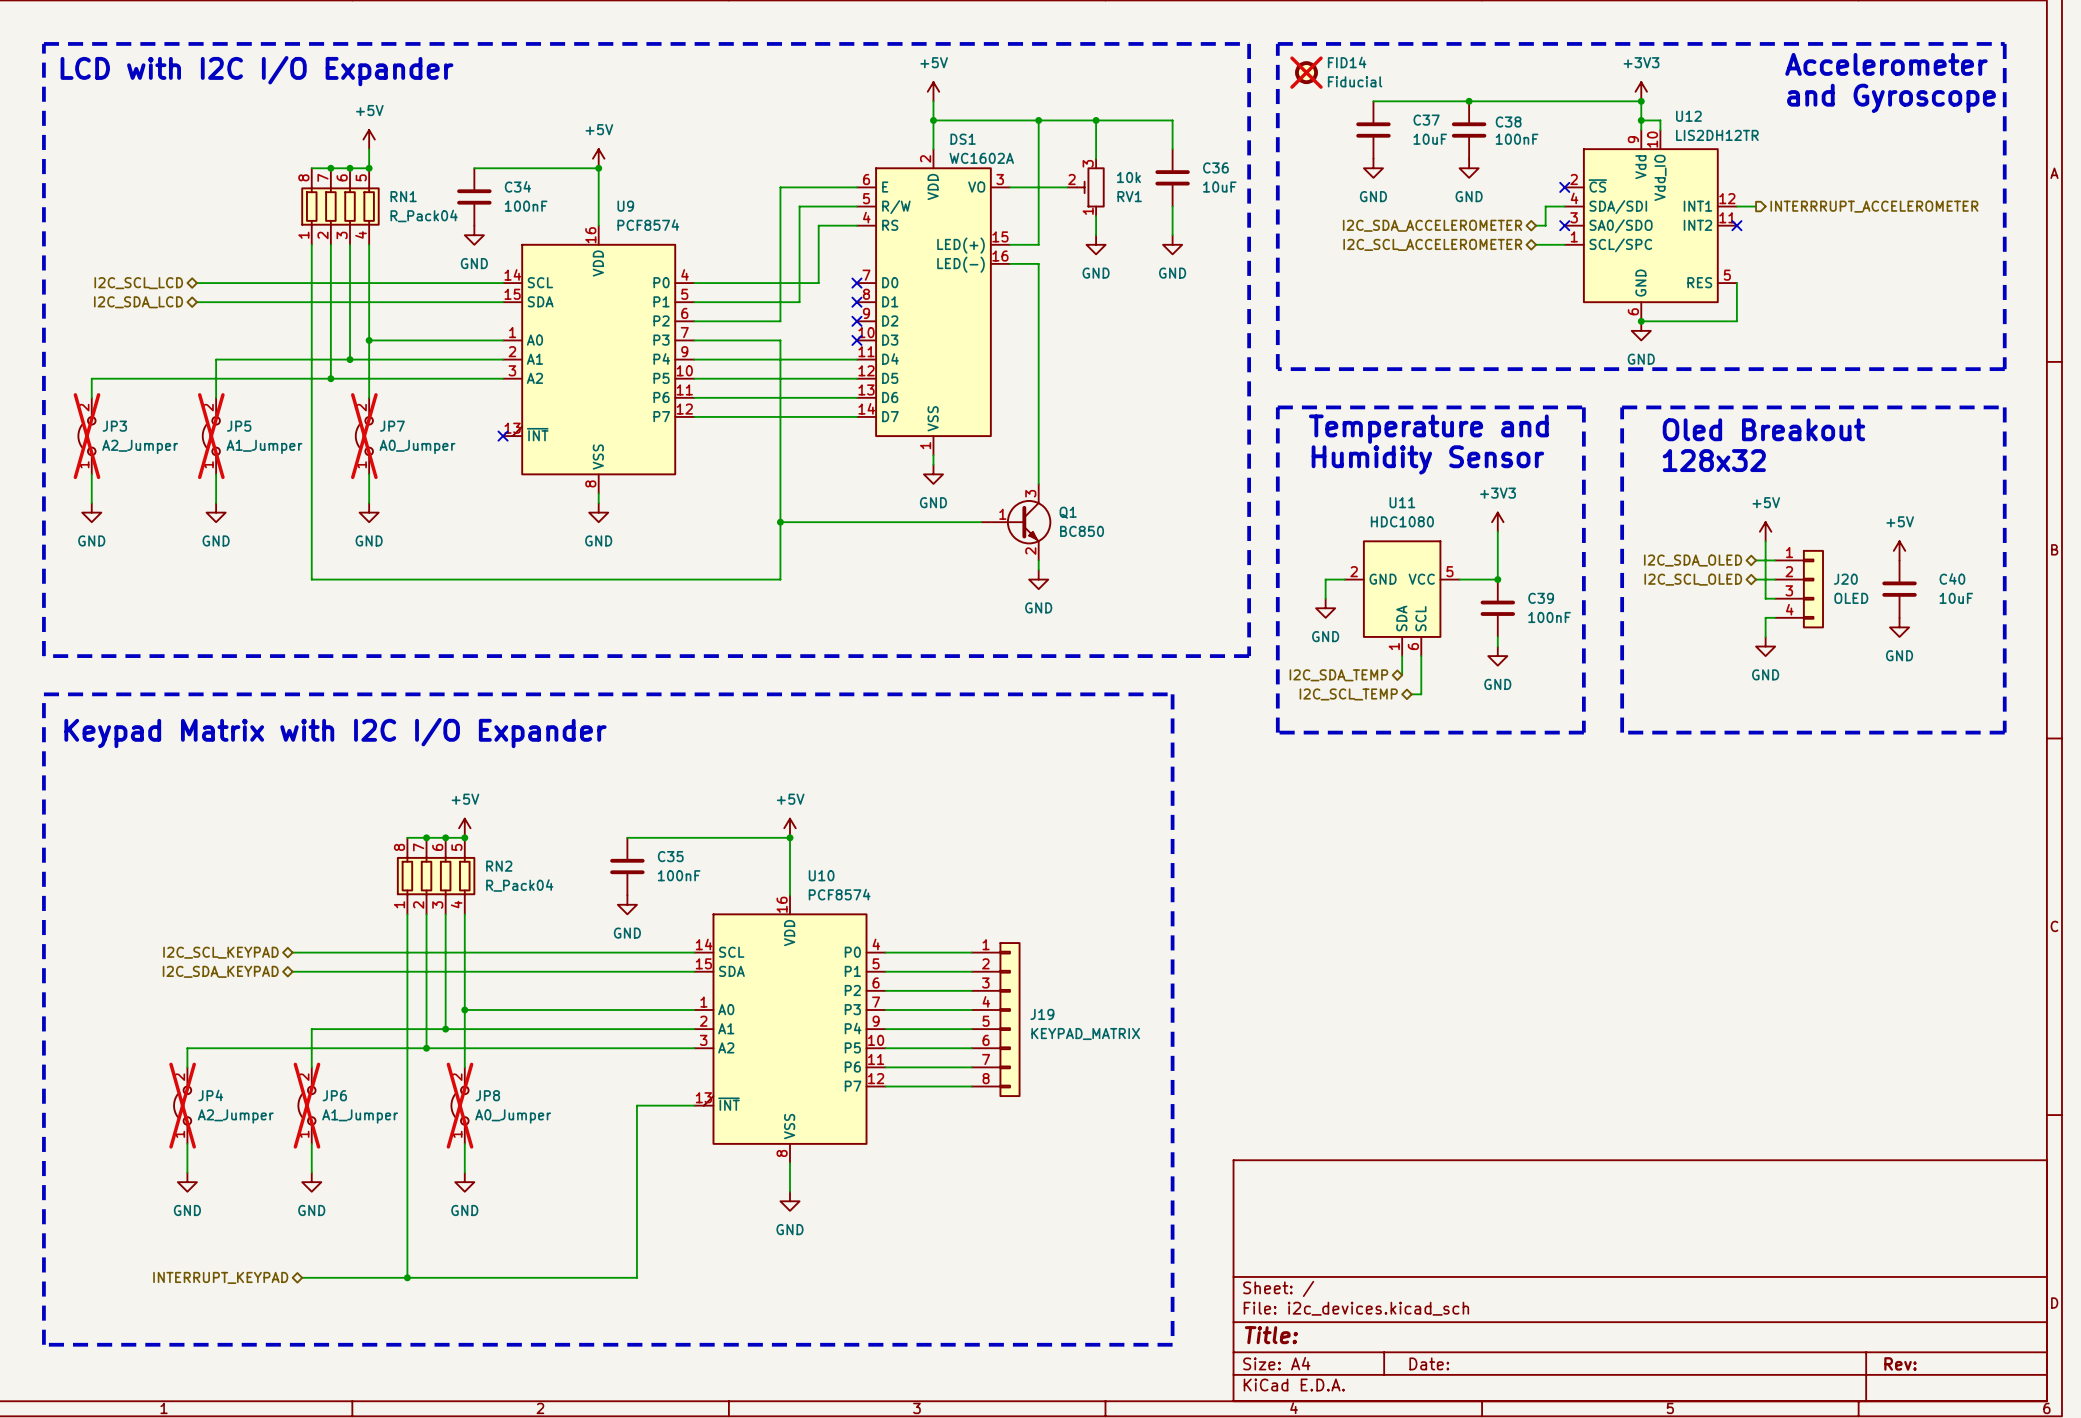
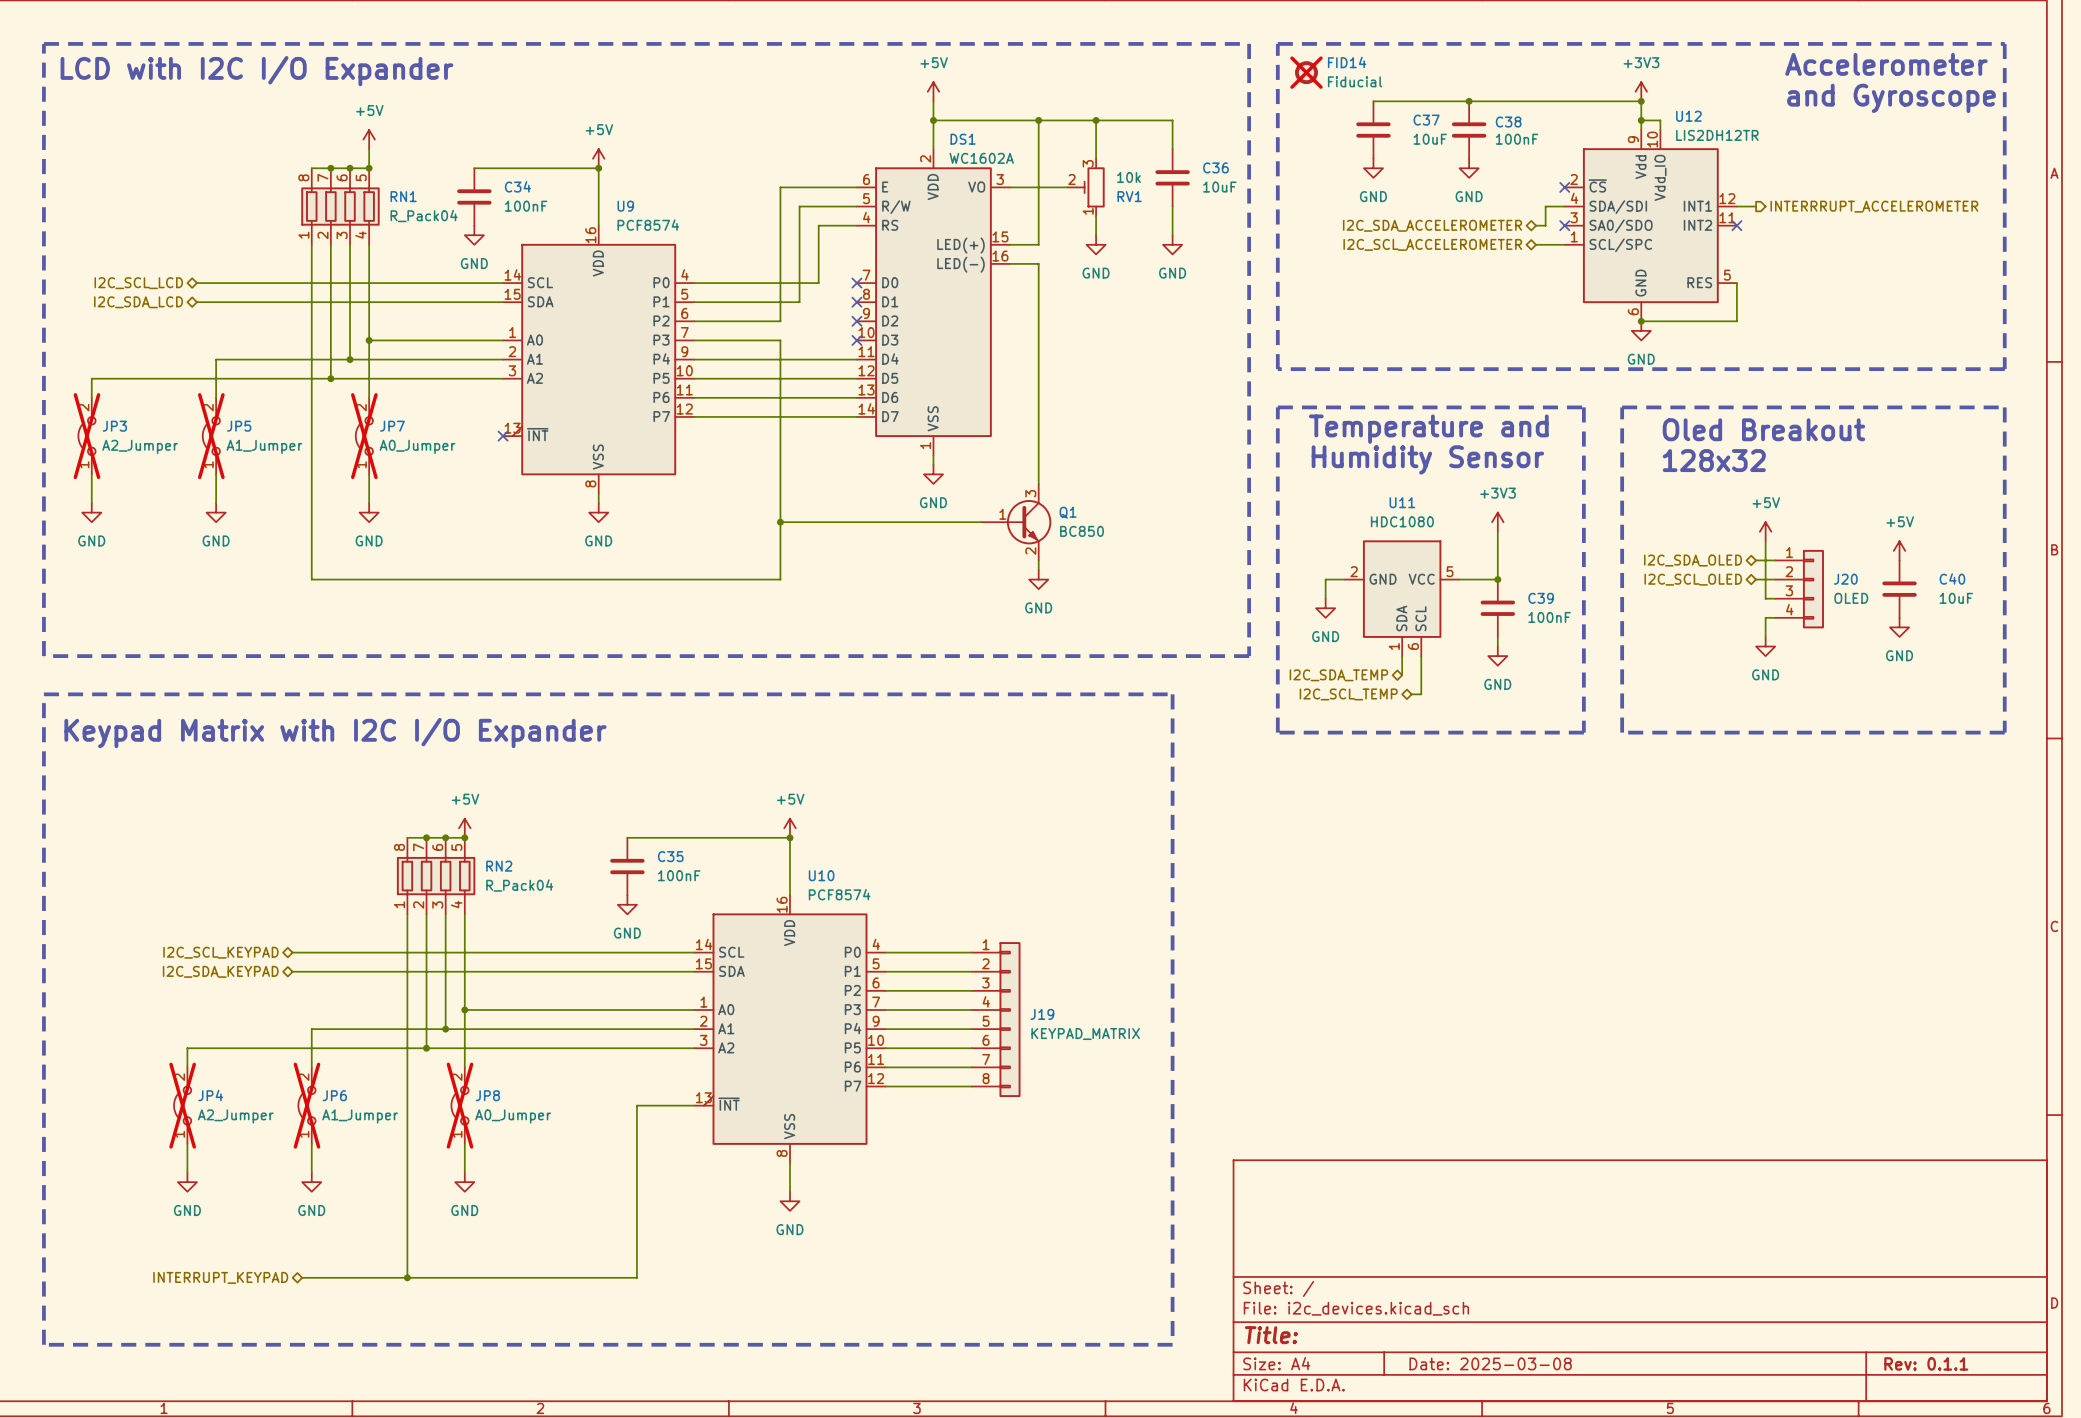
title block: Date: (1429, 1363) -> Date: 2025-03-08 (1490, 1363)
title block: Rev: (1900, 1363) -> Rev: 0.1.1 (1926, 1363)

